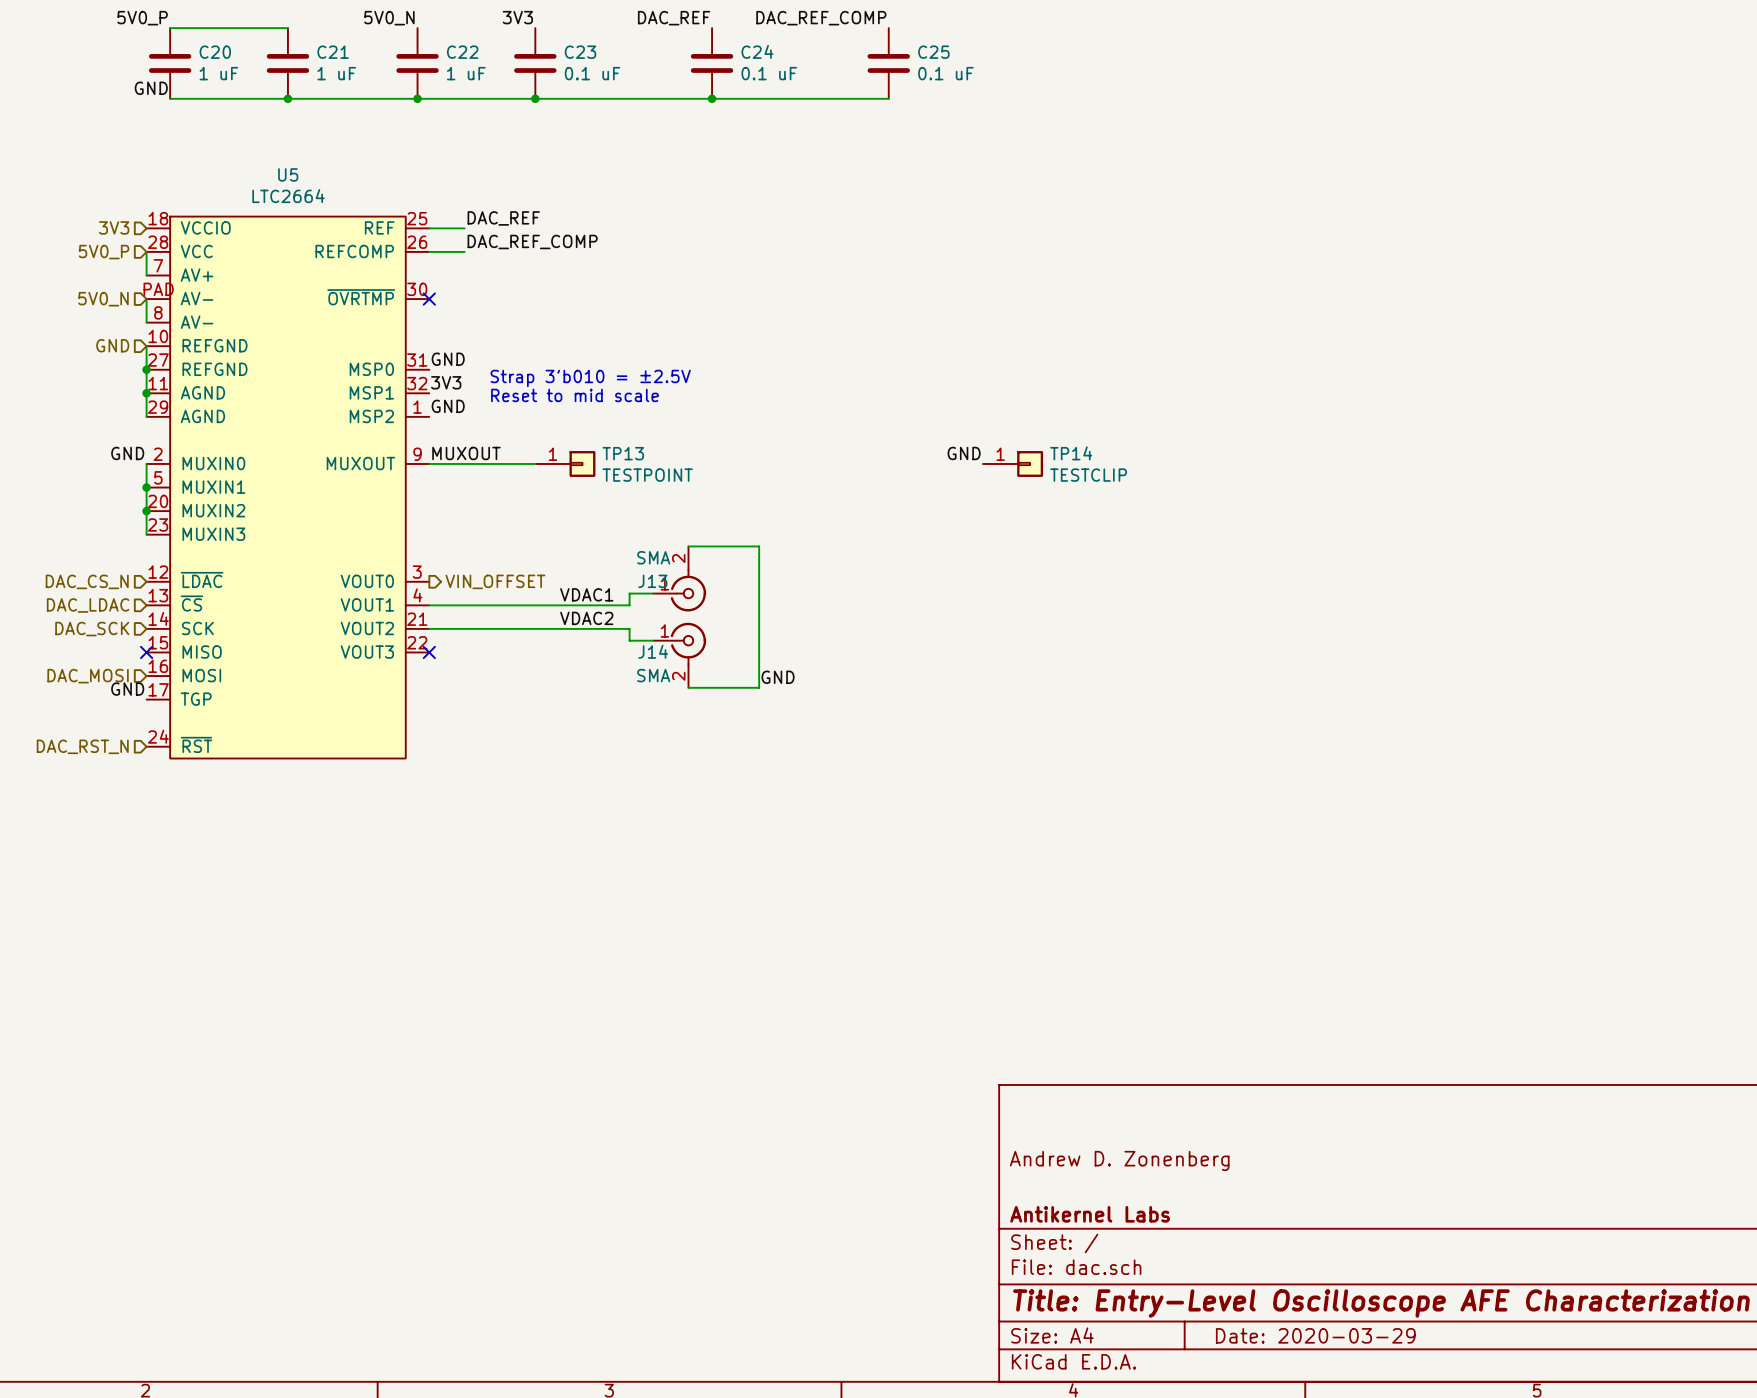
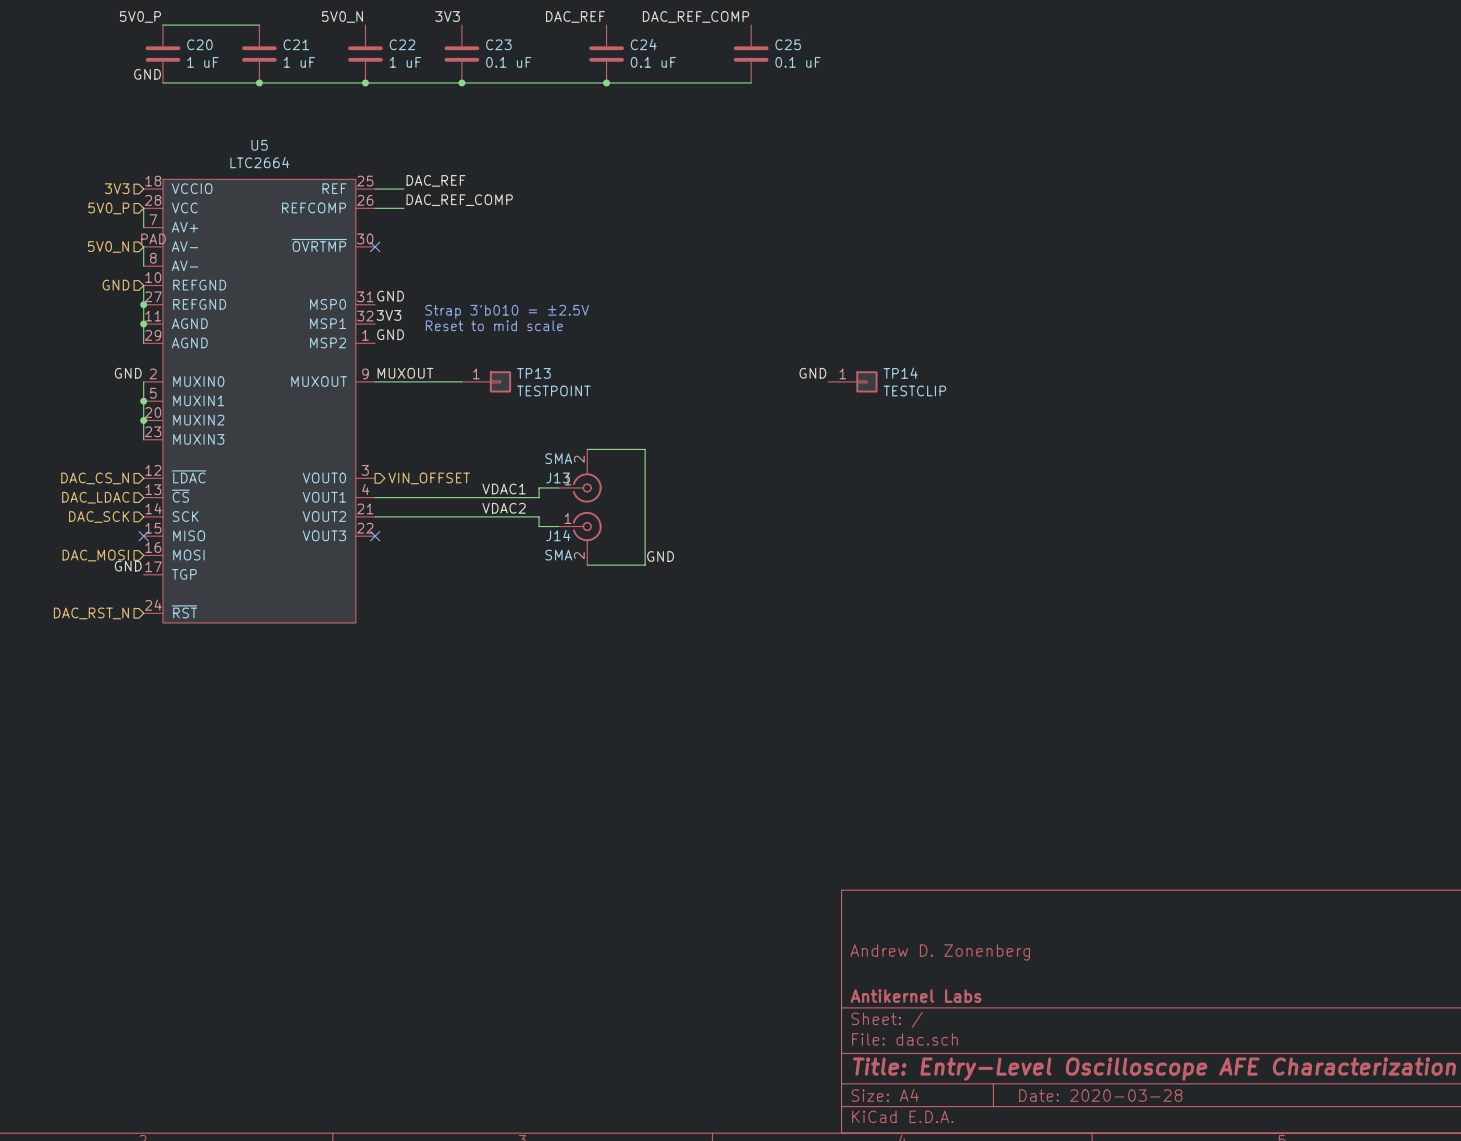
title block: Date: 2020-03-29 (1315, 1335) -> Date: 2020-03-28 (1100, 1095)

